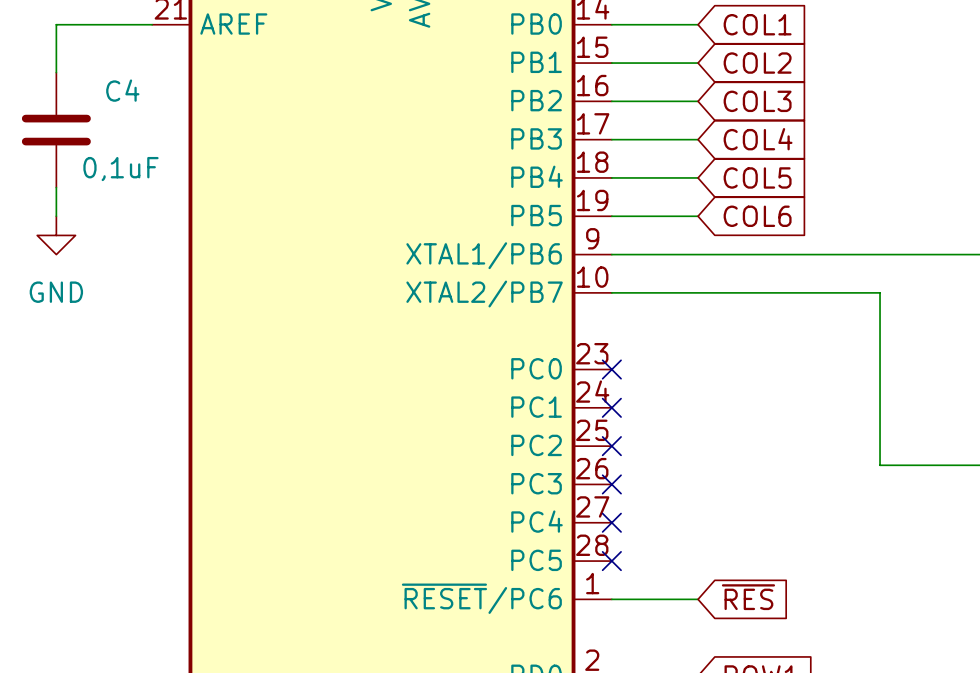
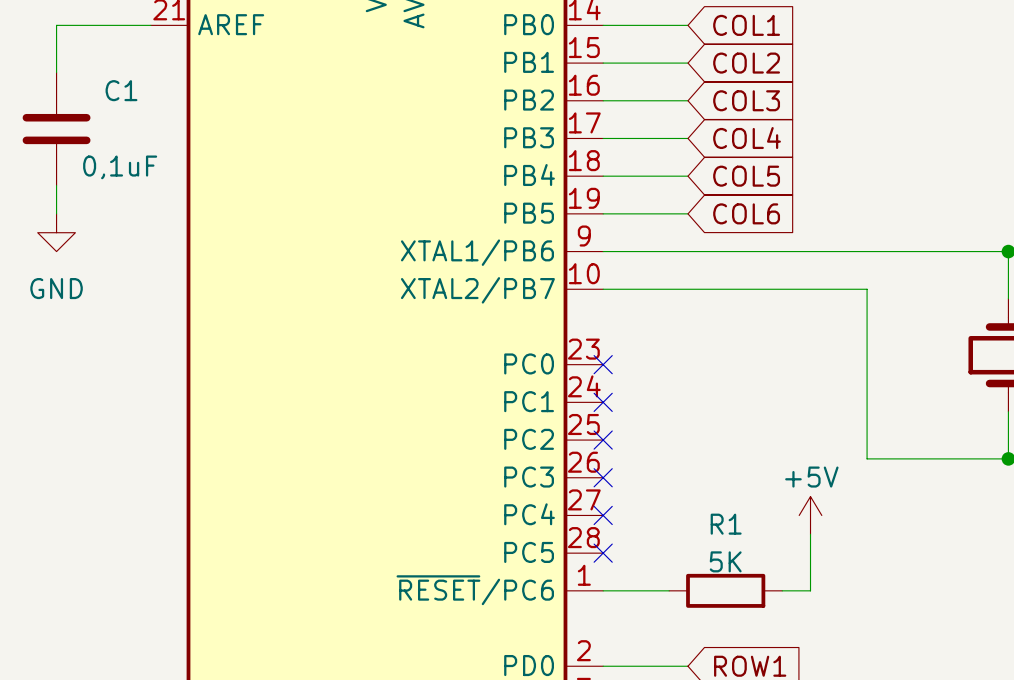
C4 name: C4 (122, 90) -> C1 (121, 90)
power symbol: none -> +5V (810, 515)
wire: none -> (810, 534) (810, 590) (782, 590)
global label: ~{RES} (748, 597) -> none
R1: none -> 5K (725, 590)

